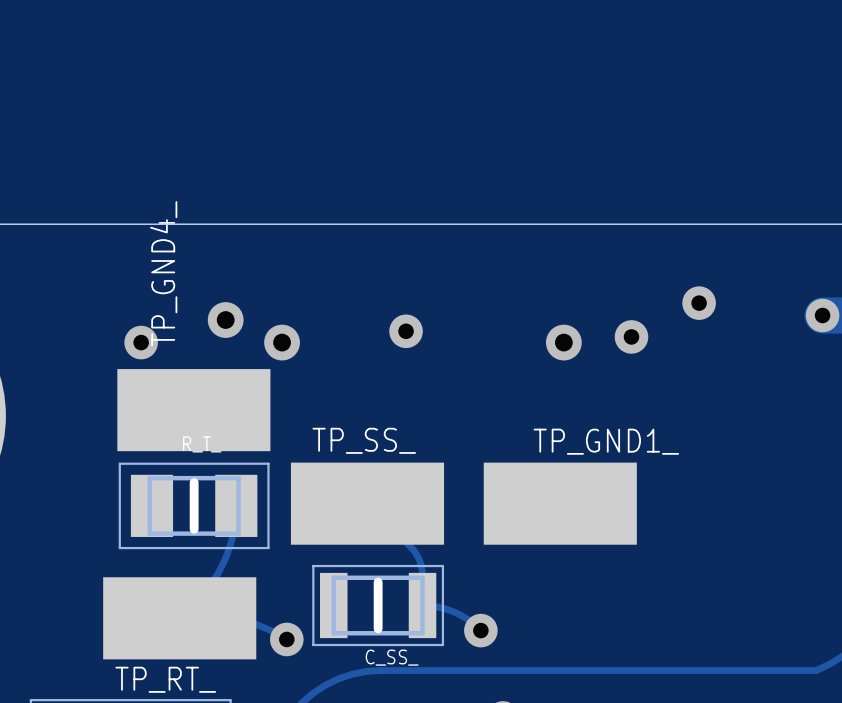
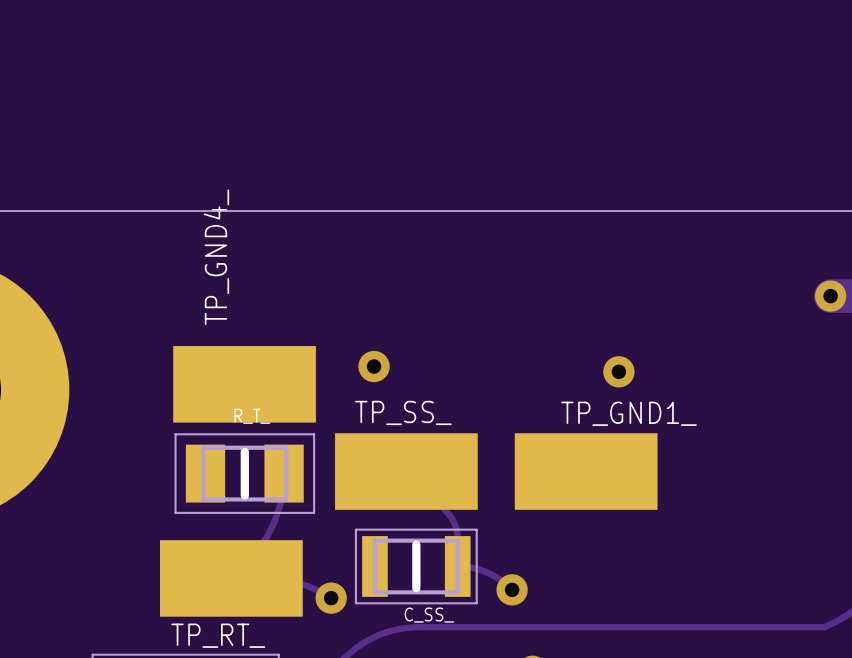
via: (699, 303) -> none
via: (225, 320) -> none
via position: (406, 331) -> (374, 366)
via: (631, 336) -> none
via: (141, 342) -> none
via: (282, 342) -> none
via: (563, 342) -> none
via: none -> (618, 371)

